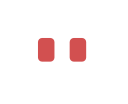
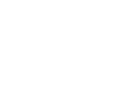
part: (62, 49) -> none

